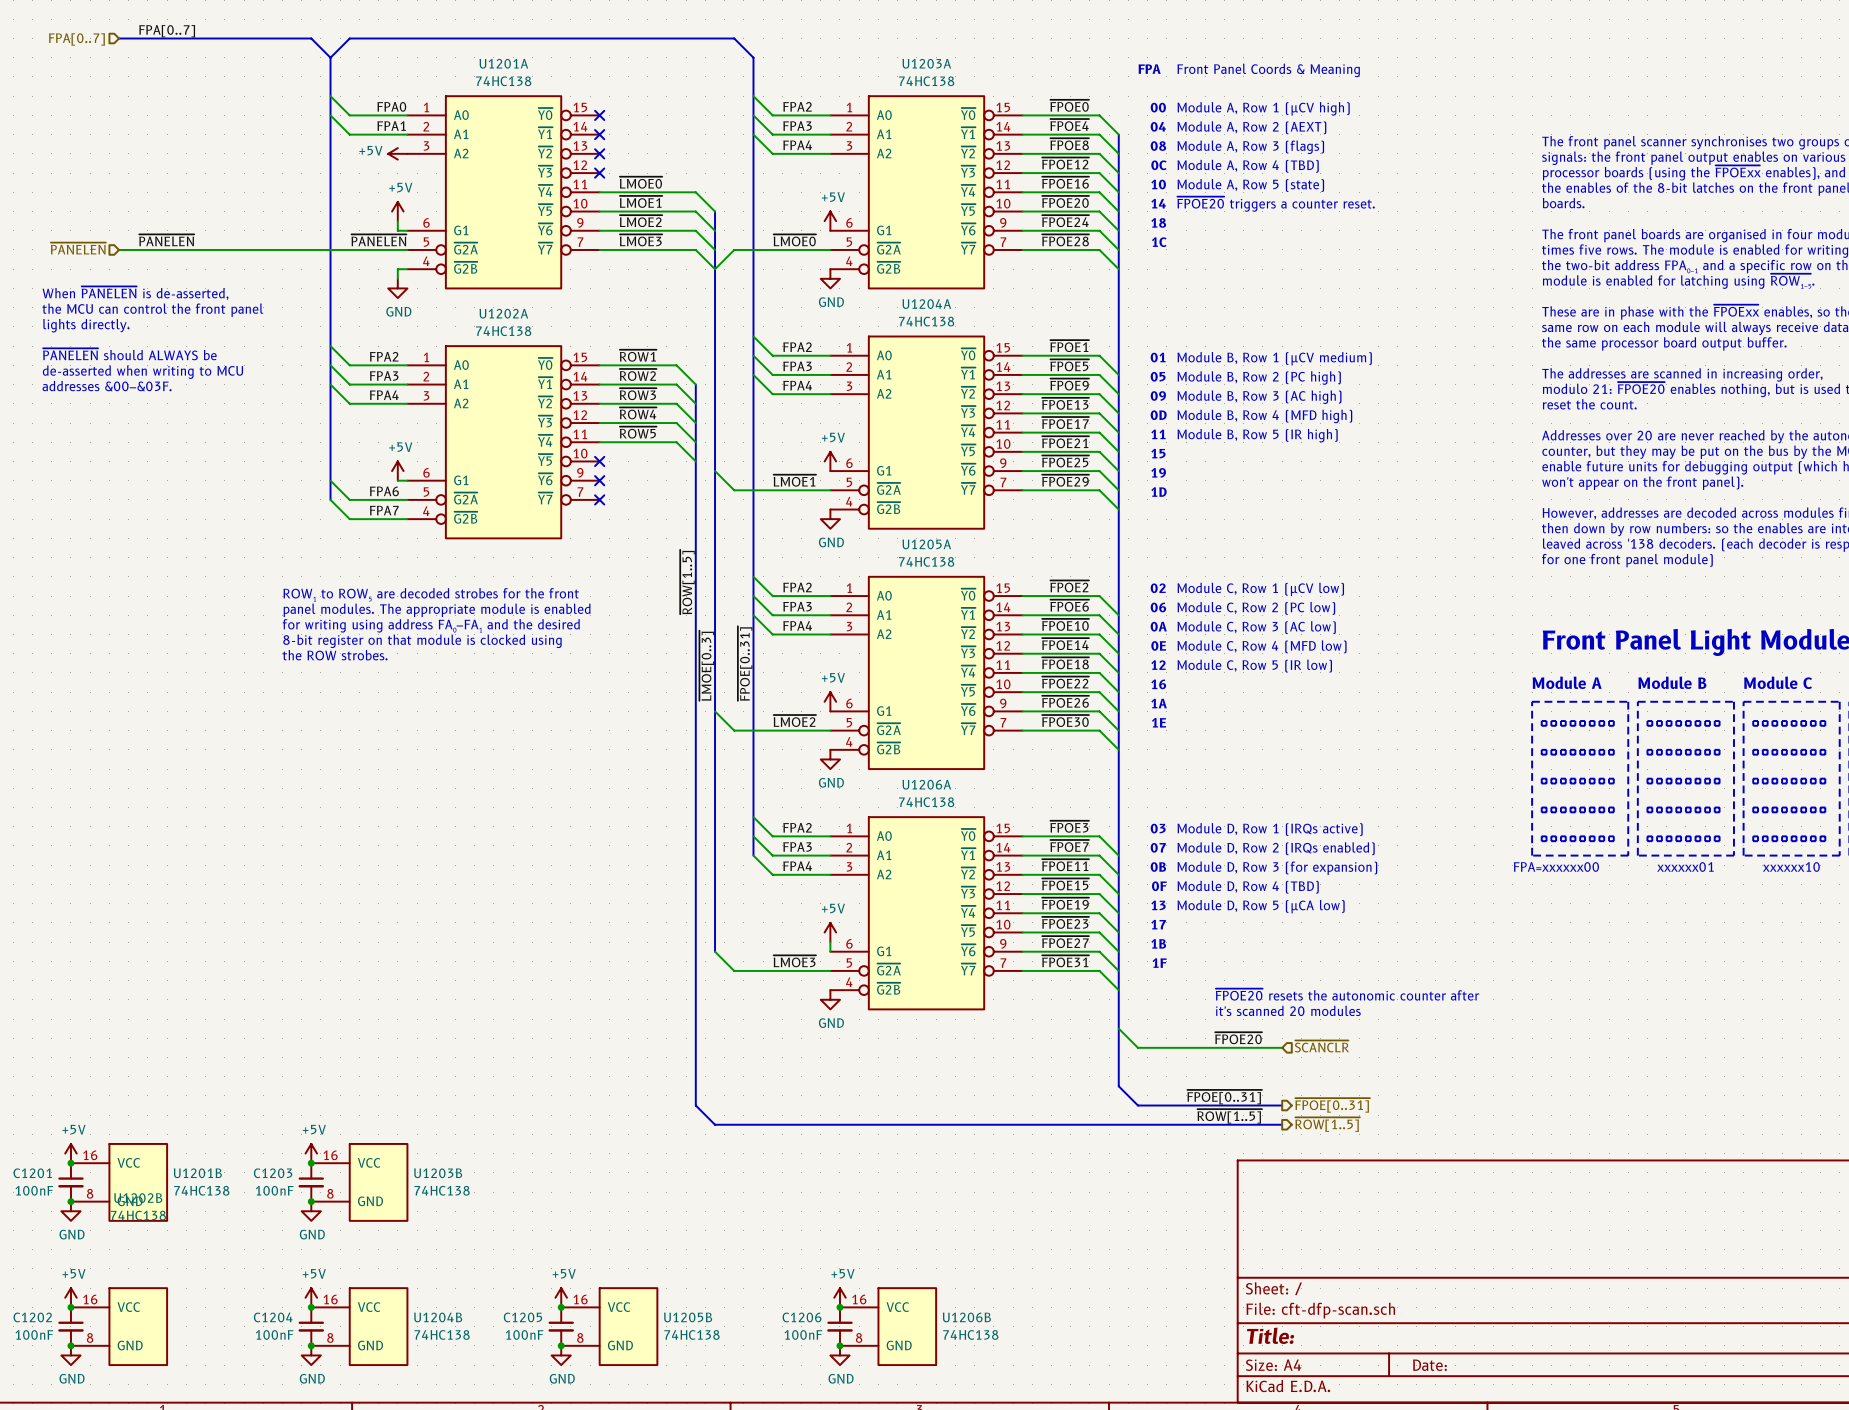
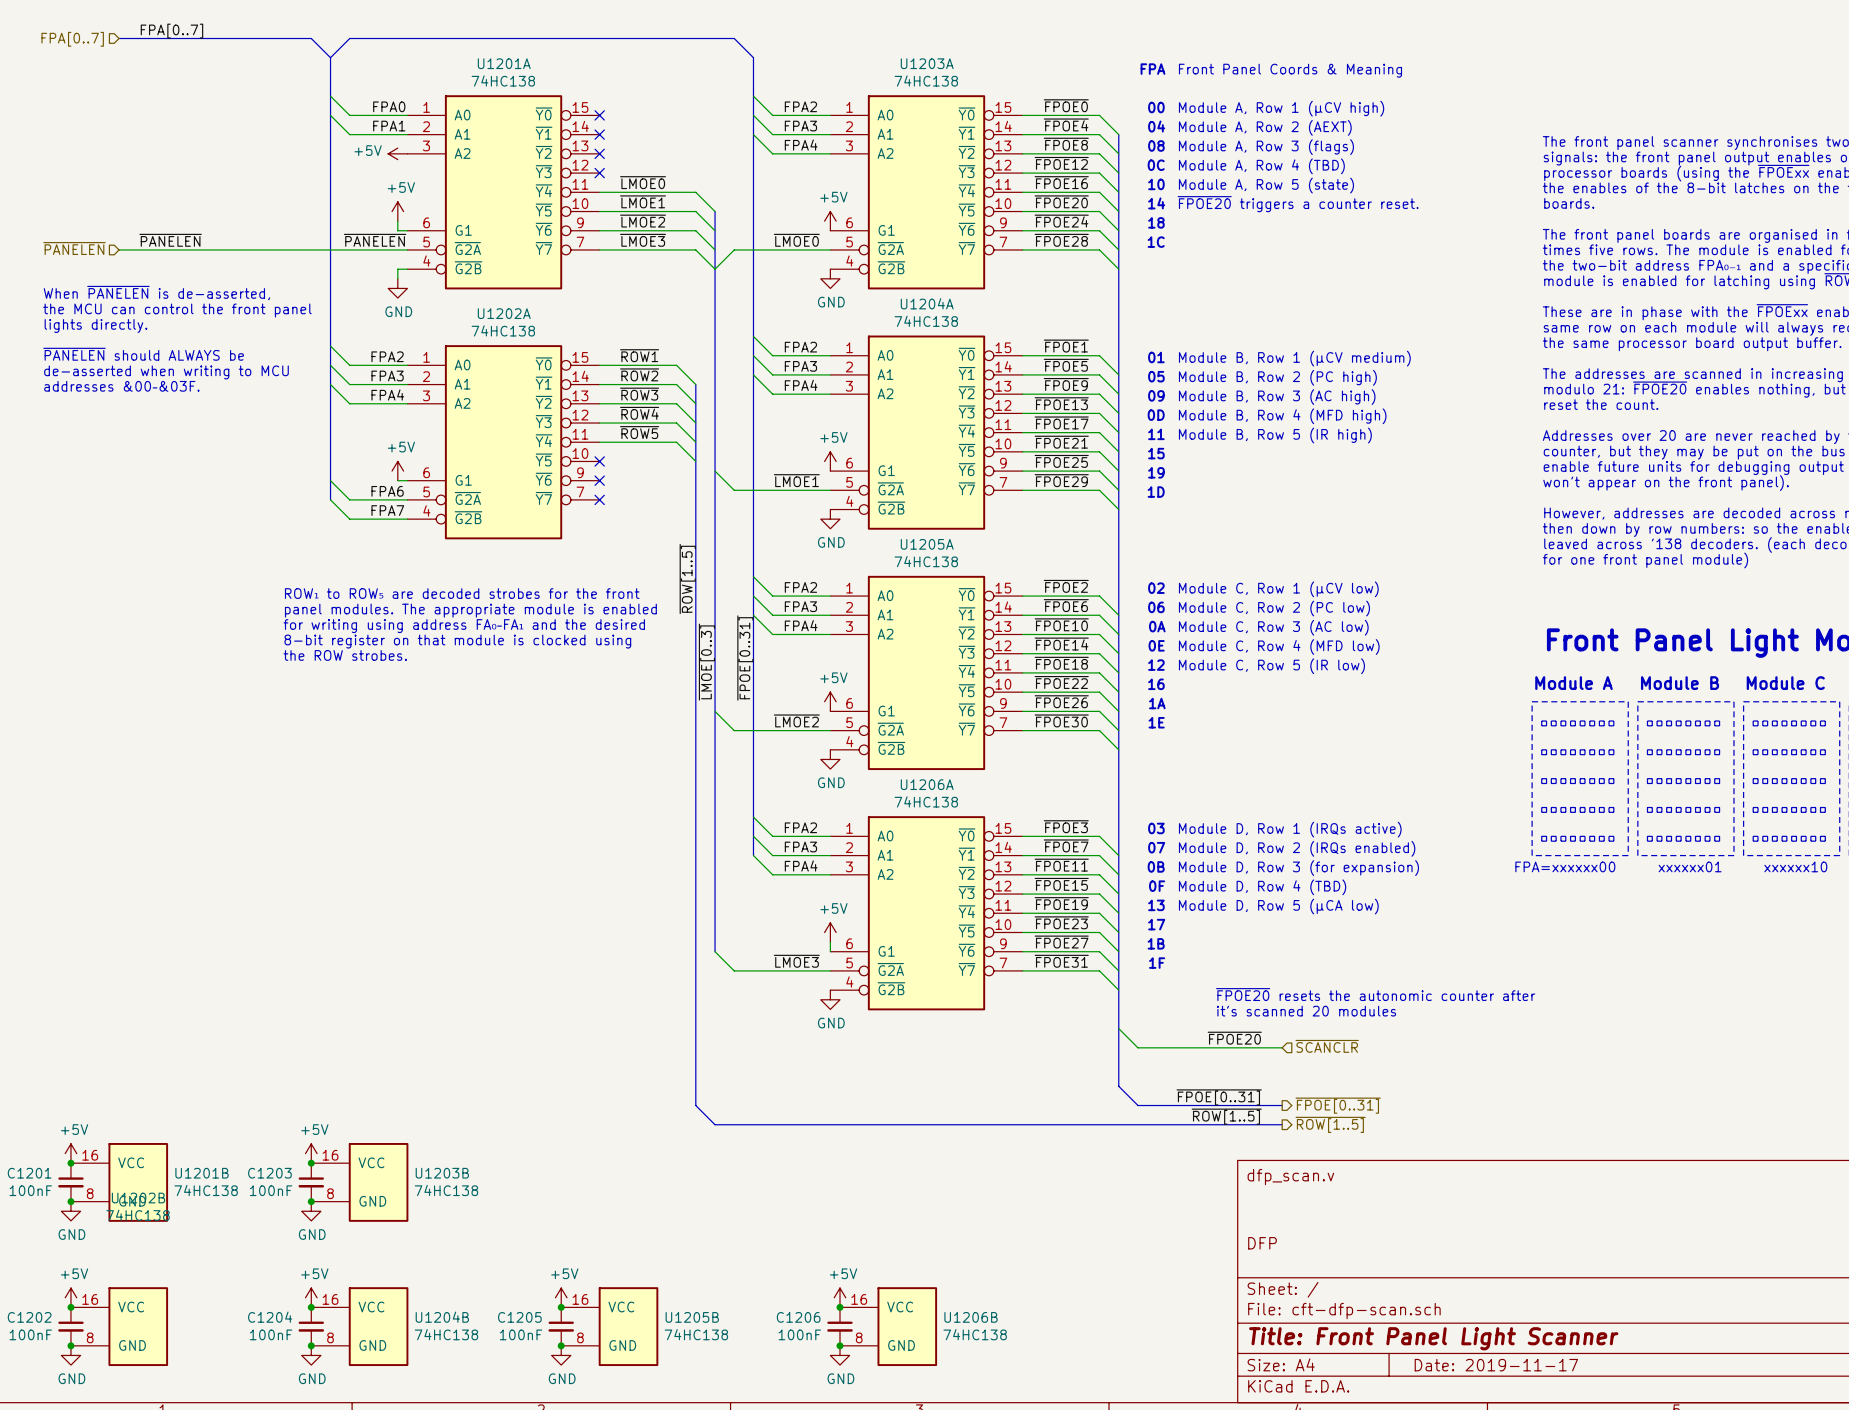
title block: none -> dfp_scan.v (1290, 1177)
title block: none -> DFP (1262, 1243)
title block: Title: (1270, 1335) -> Title: Front Panel Light Scanner (1433, 1338)
title block: Date: (1429, 1365) -> Date: 2019-11-17 (1496, 1365)

